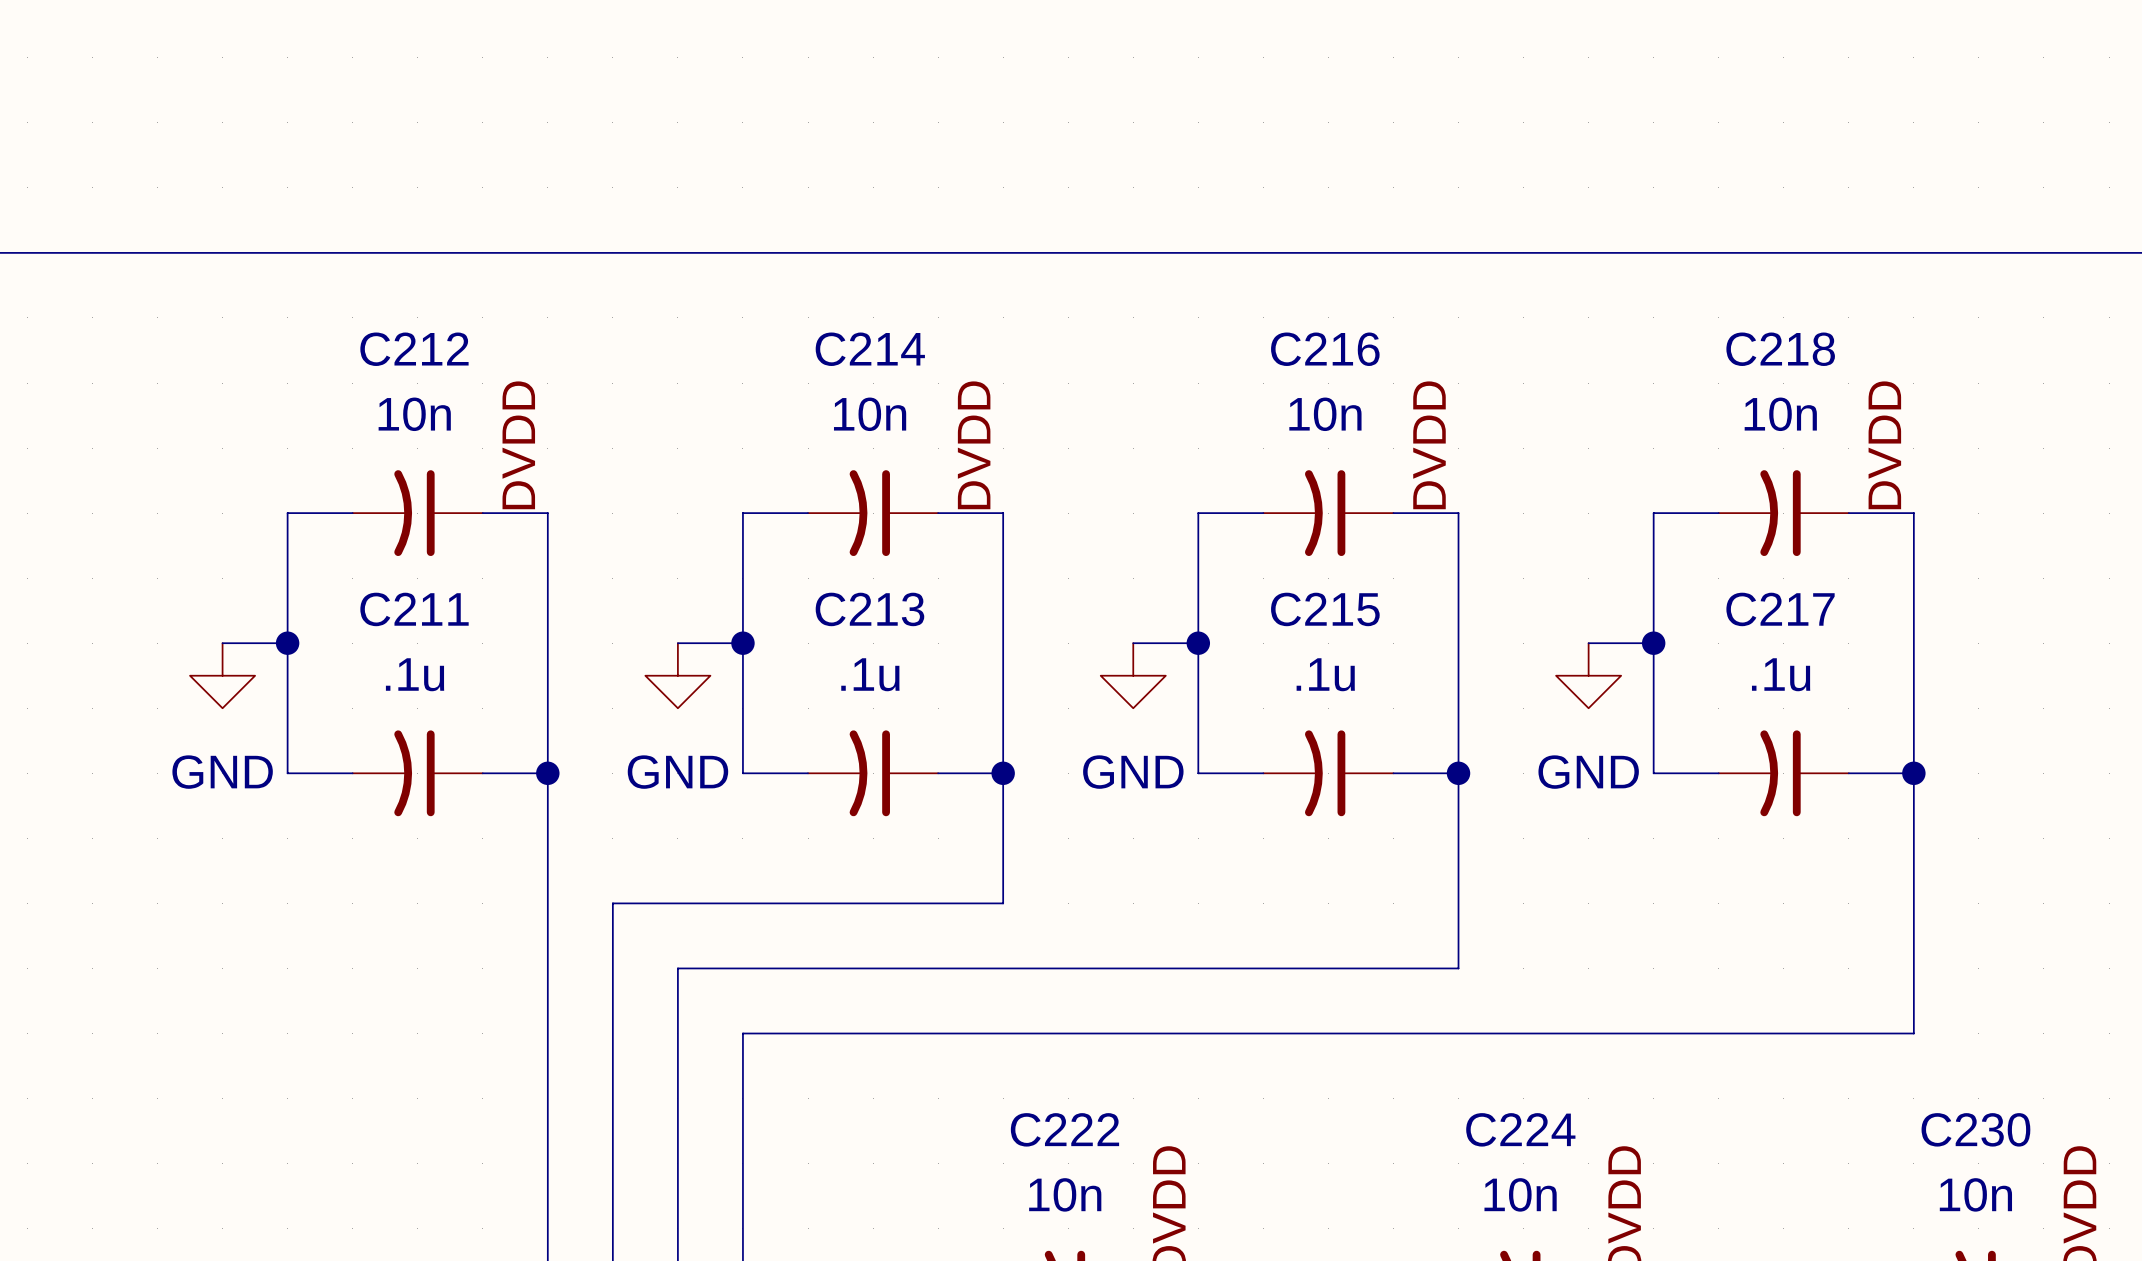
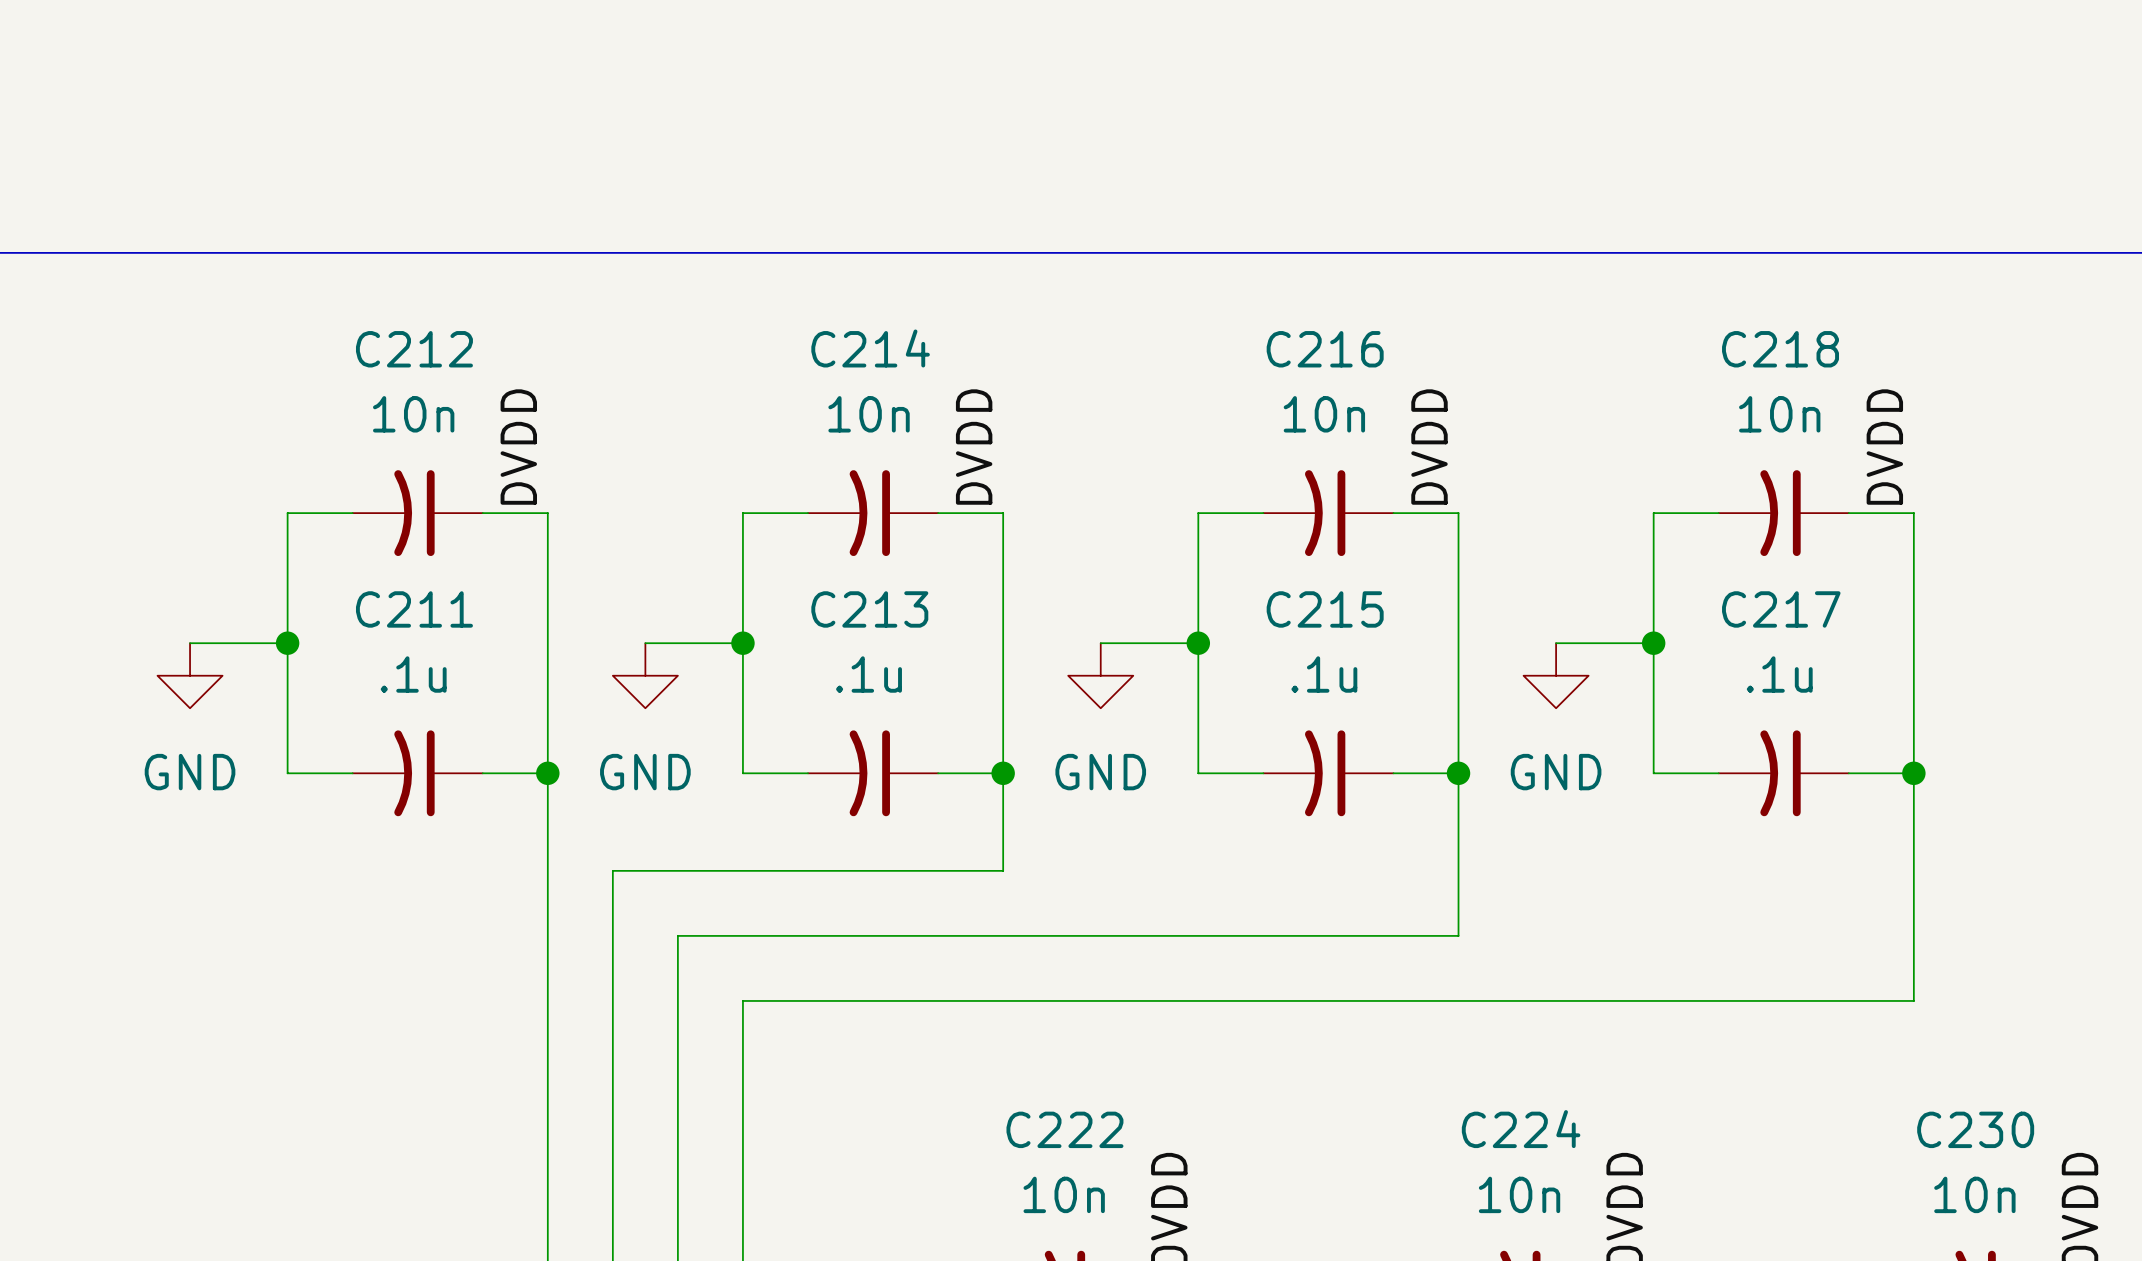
wire: none -> (190, 643) (222, 643)
wire: none -> (645, 643) (677, 643)
wire: none -> (1100, 643) (1133, 643)
wire: none -> (1556, 643) (1588, 643)
power symbol position: GND (222, 675) -> GND (190, 675)
power symbol position: GND (677, 675) -> GND (645, 675)
power symbol position: GND (1133, 675) -> GND (1100, 675)
power symbol position: GND (1588, 675) -> GND (1556, 675)
wire: (1003, 870) (1003, 903) (612, 903) -> (1003, 870) (612, 870) (612, 903)
wire: (1458, 935) (1458, 968) (677, 968) -> (1458, 935) (677, 935) (677, 968)
wire: (1913, 1000) (1913, 1033) (742, 1033) -> (1913, 1000) (742, 1000) (742, 1033)

